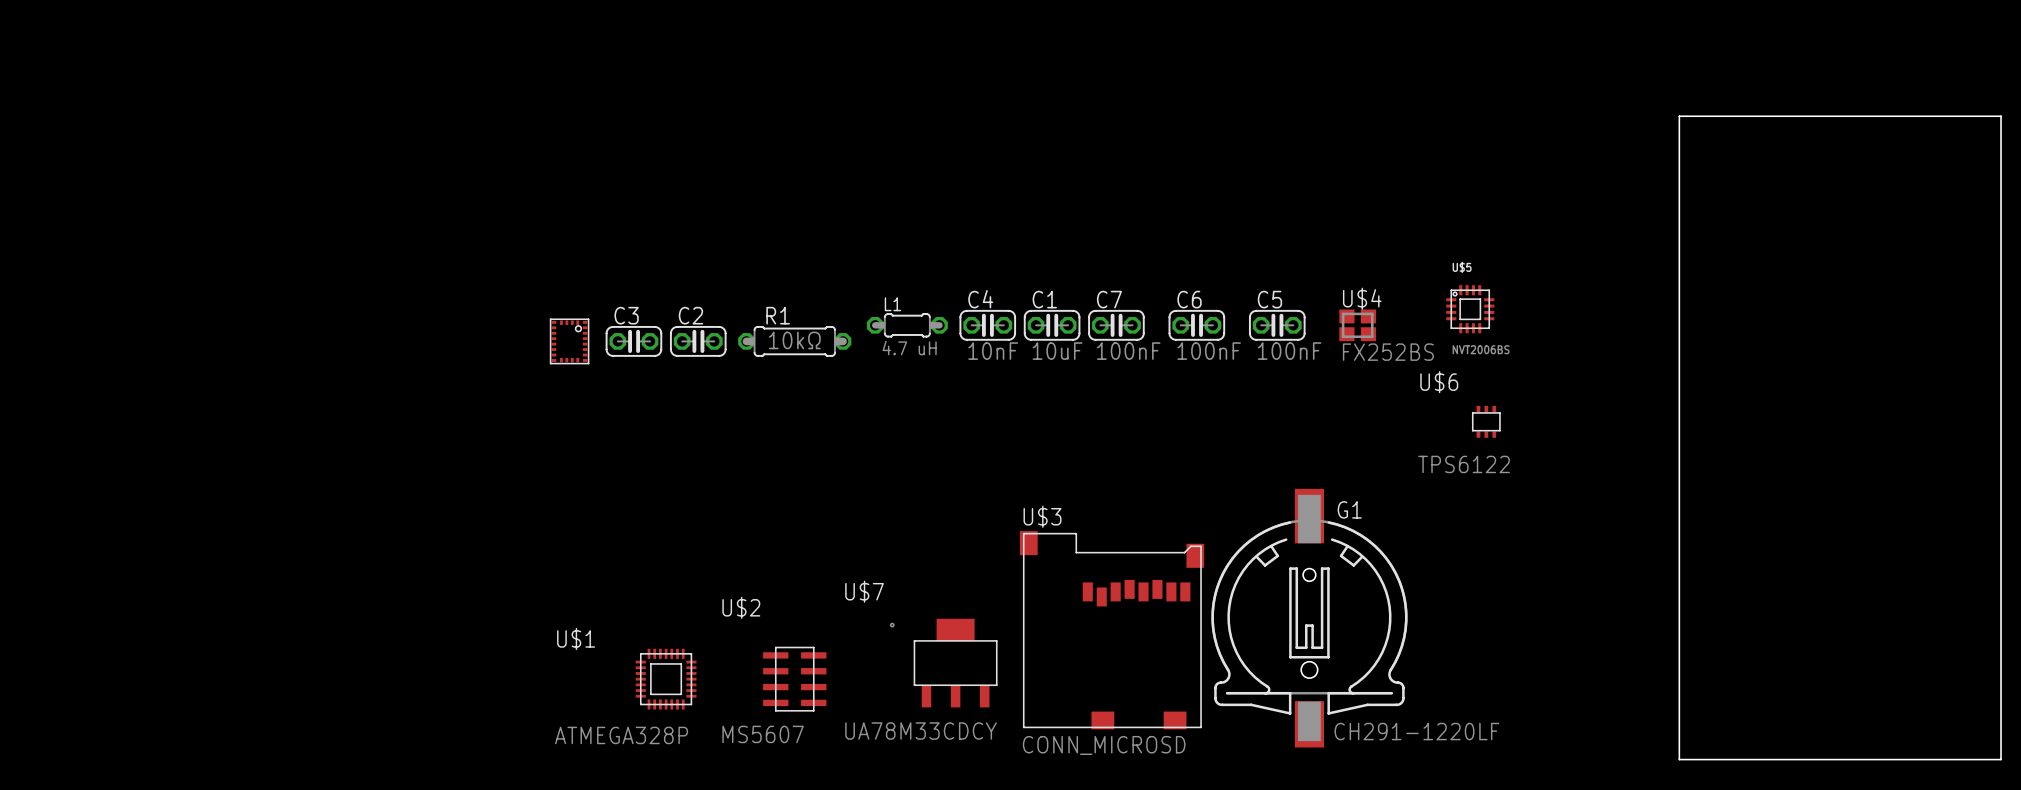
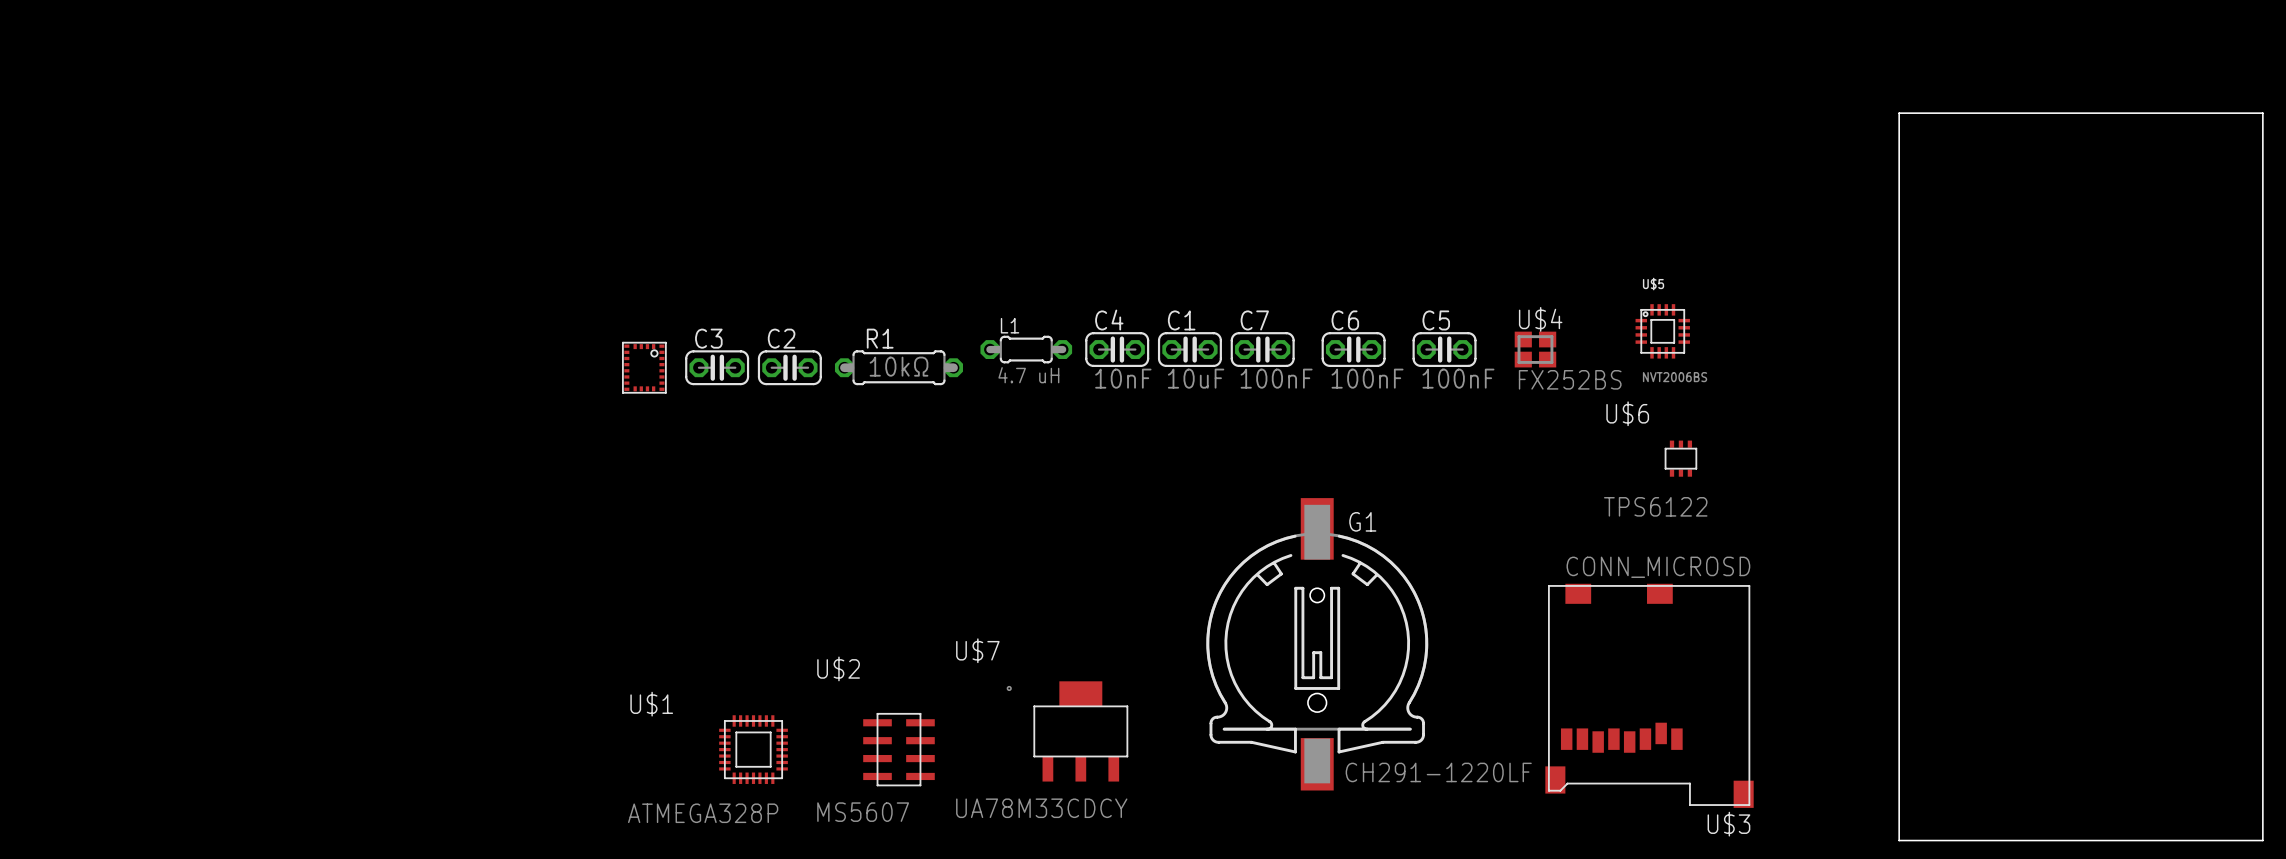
G1 position: (1309, 618) -> (1317, 644)
U$3 rotation: 0° (1112, 630) -> 180° (1649, 695)
U$3 position: (1112, 630) -> (1649, 695)

